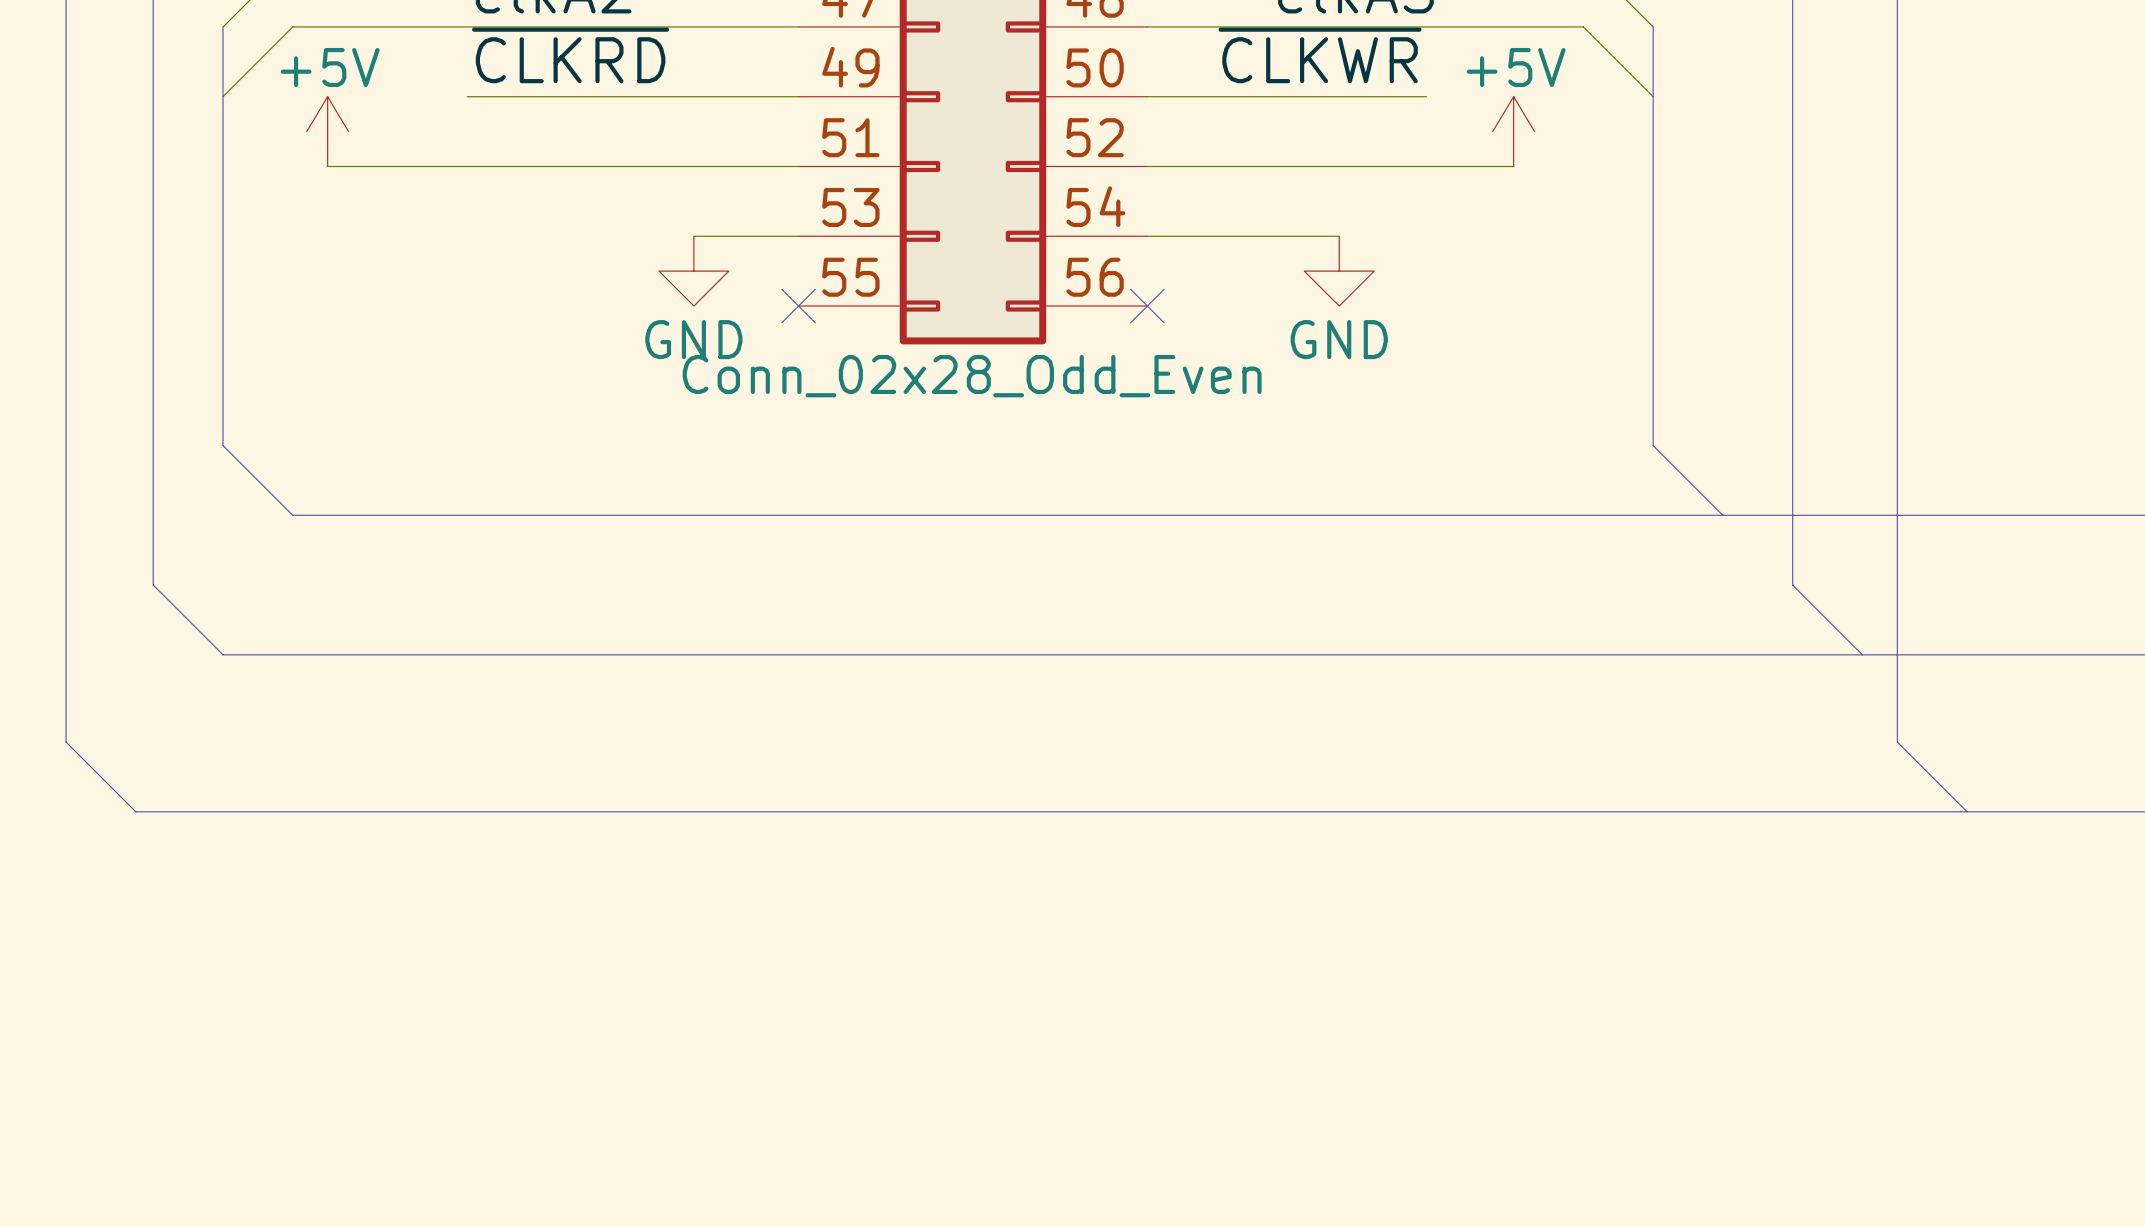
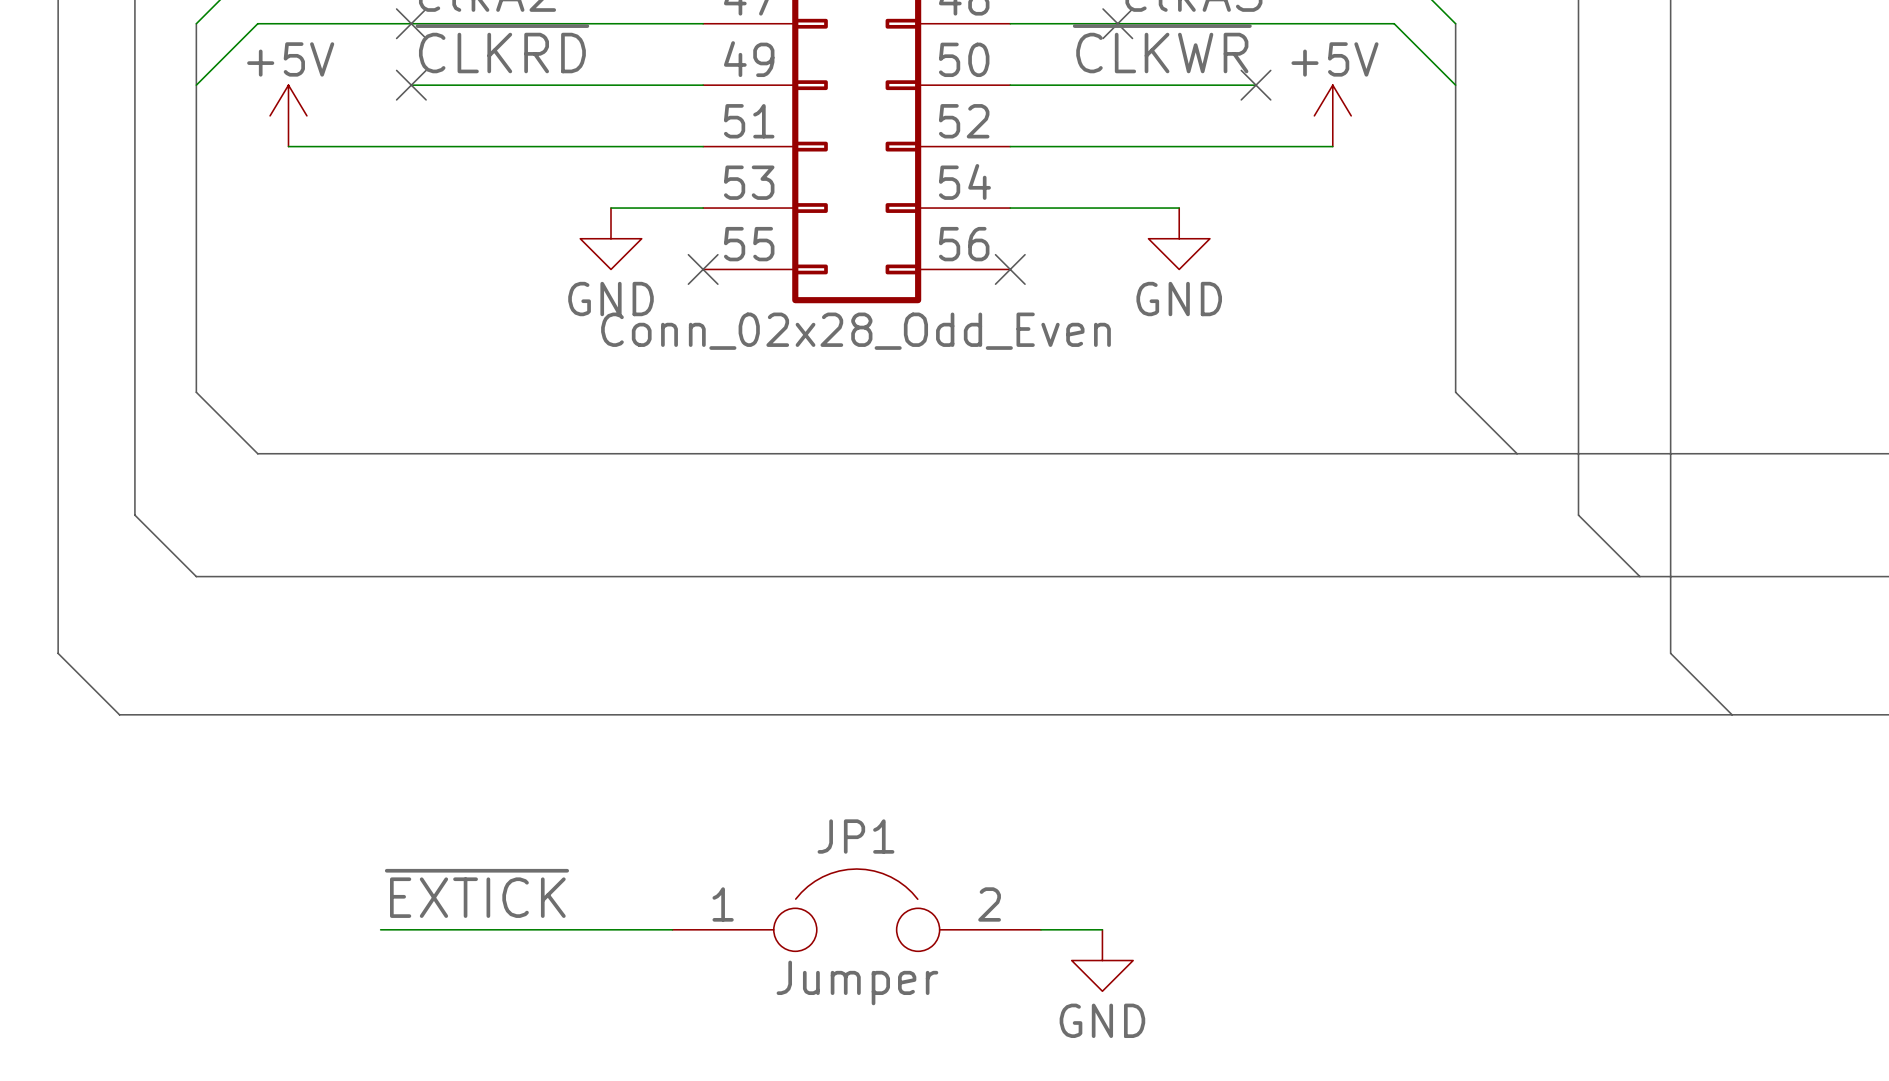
no-connect mark: none -> (411, 23)
no-connect mark: none -> (1117, 23)
no-connect mark: none -> (411, 85)
no-connect mark: none -> (1256, 85)
label: none -> ~{EXTICK} (476, 893)
JP1: none -> Jumper (856, 910)
wire: none -> (380, 929) (672, 929)
wire: none -> (1041, 929) (1102, 929)
power symbol: none -> GND (1102, 960)

